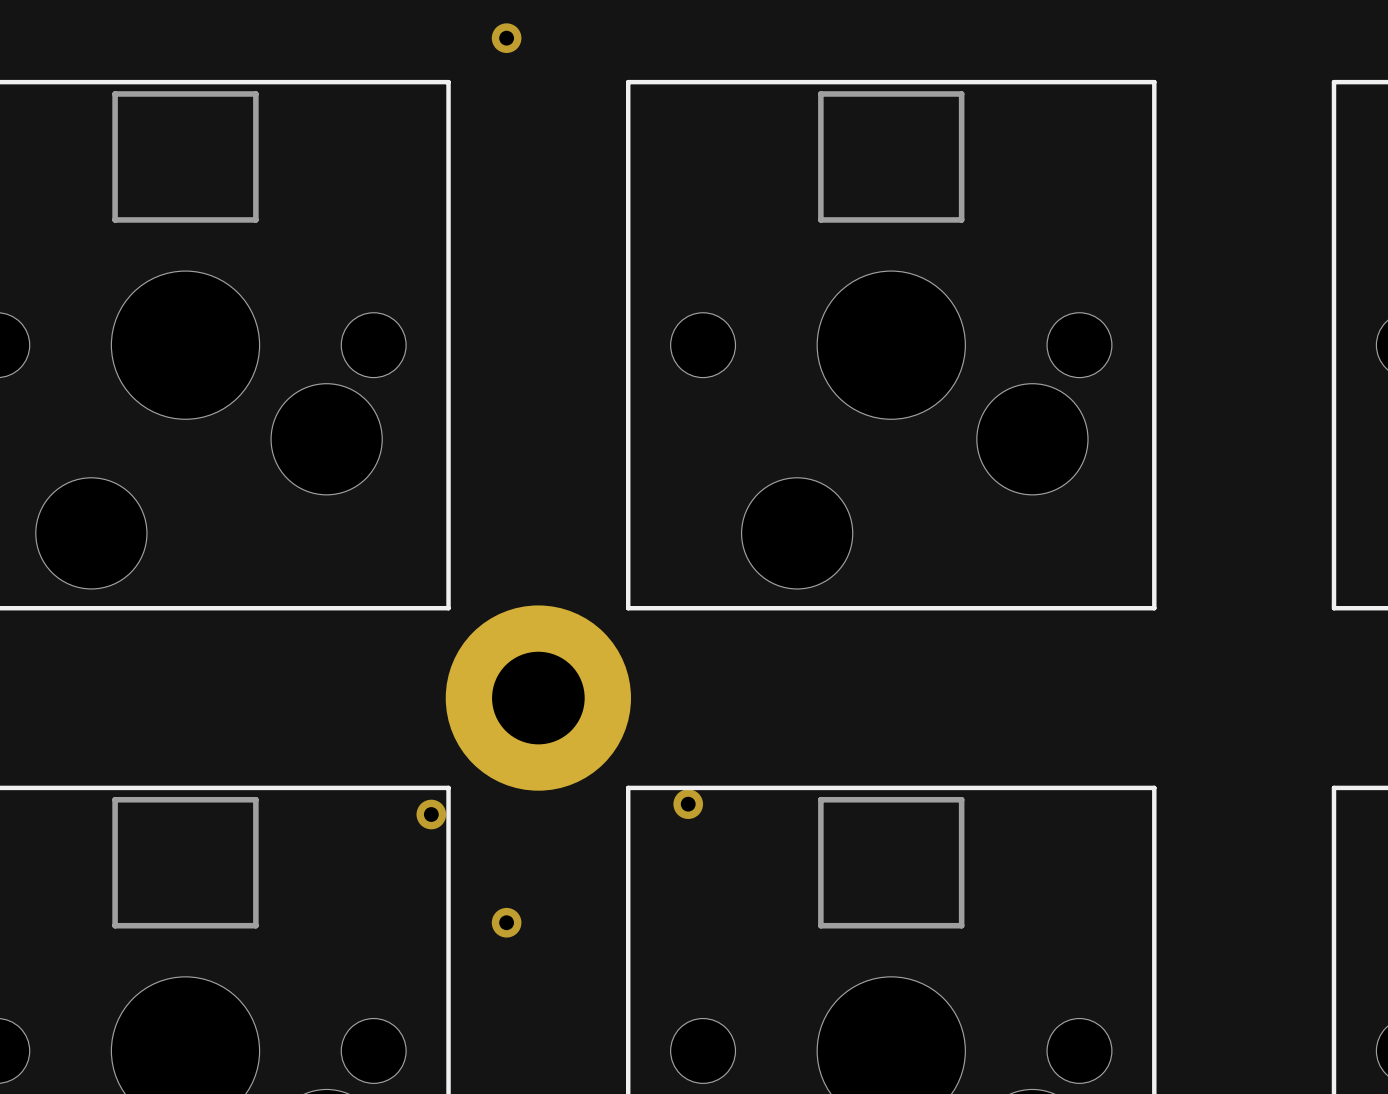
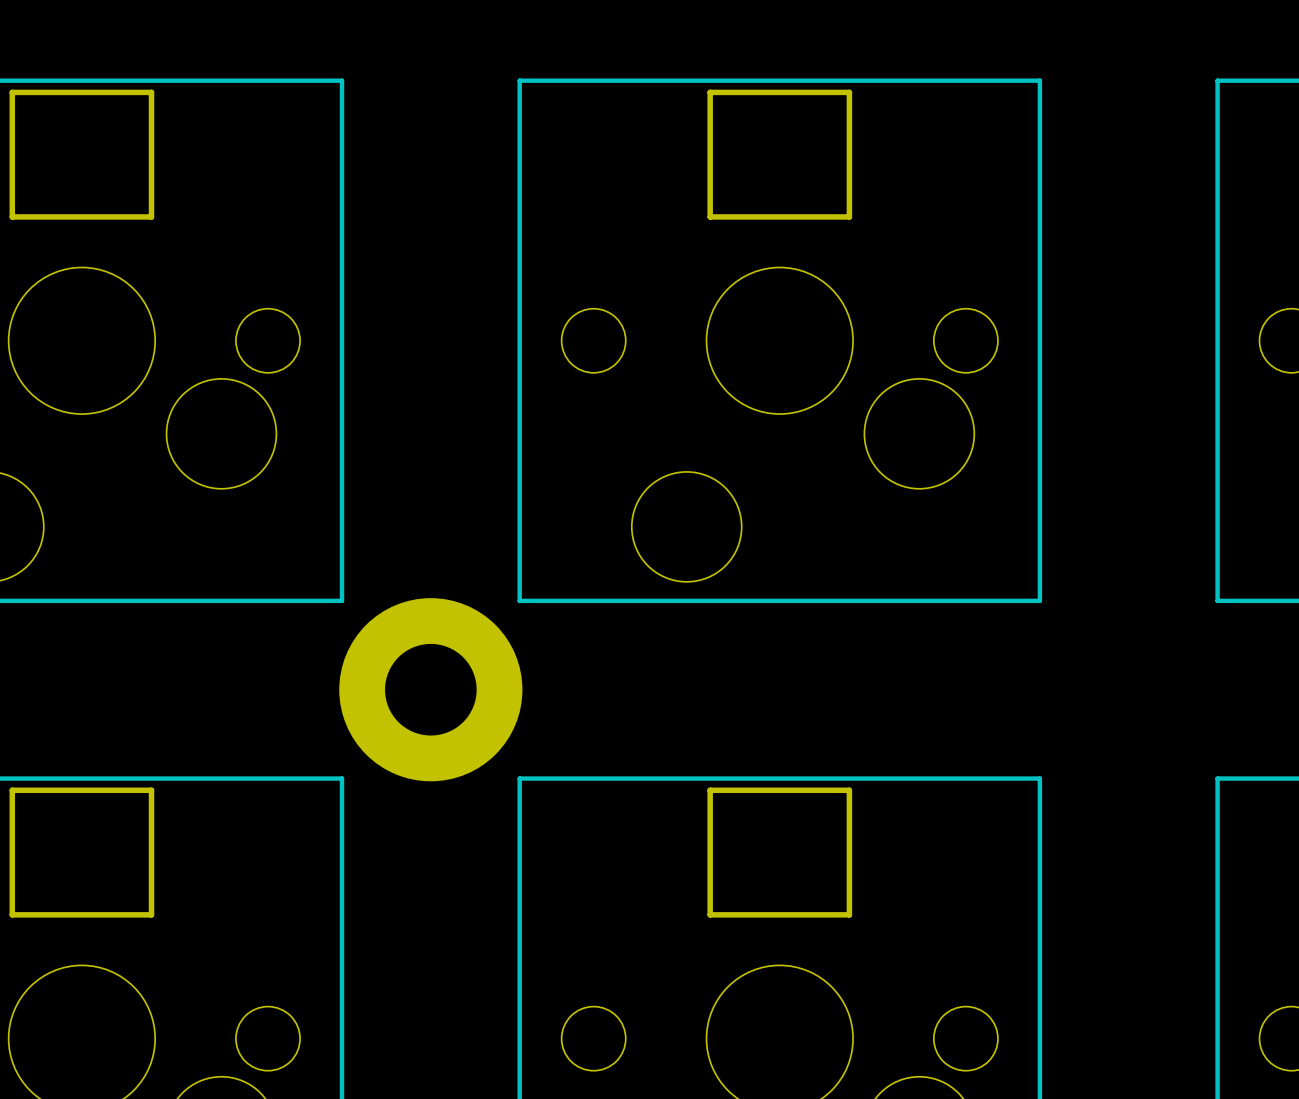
via: (506, 38) -> none
via: (688, 804) -> none
via: (431, 814) -> none
via: (506, 922) -> none

